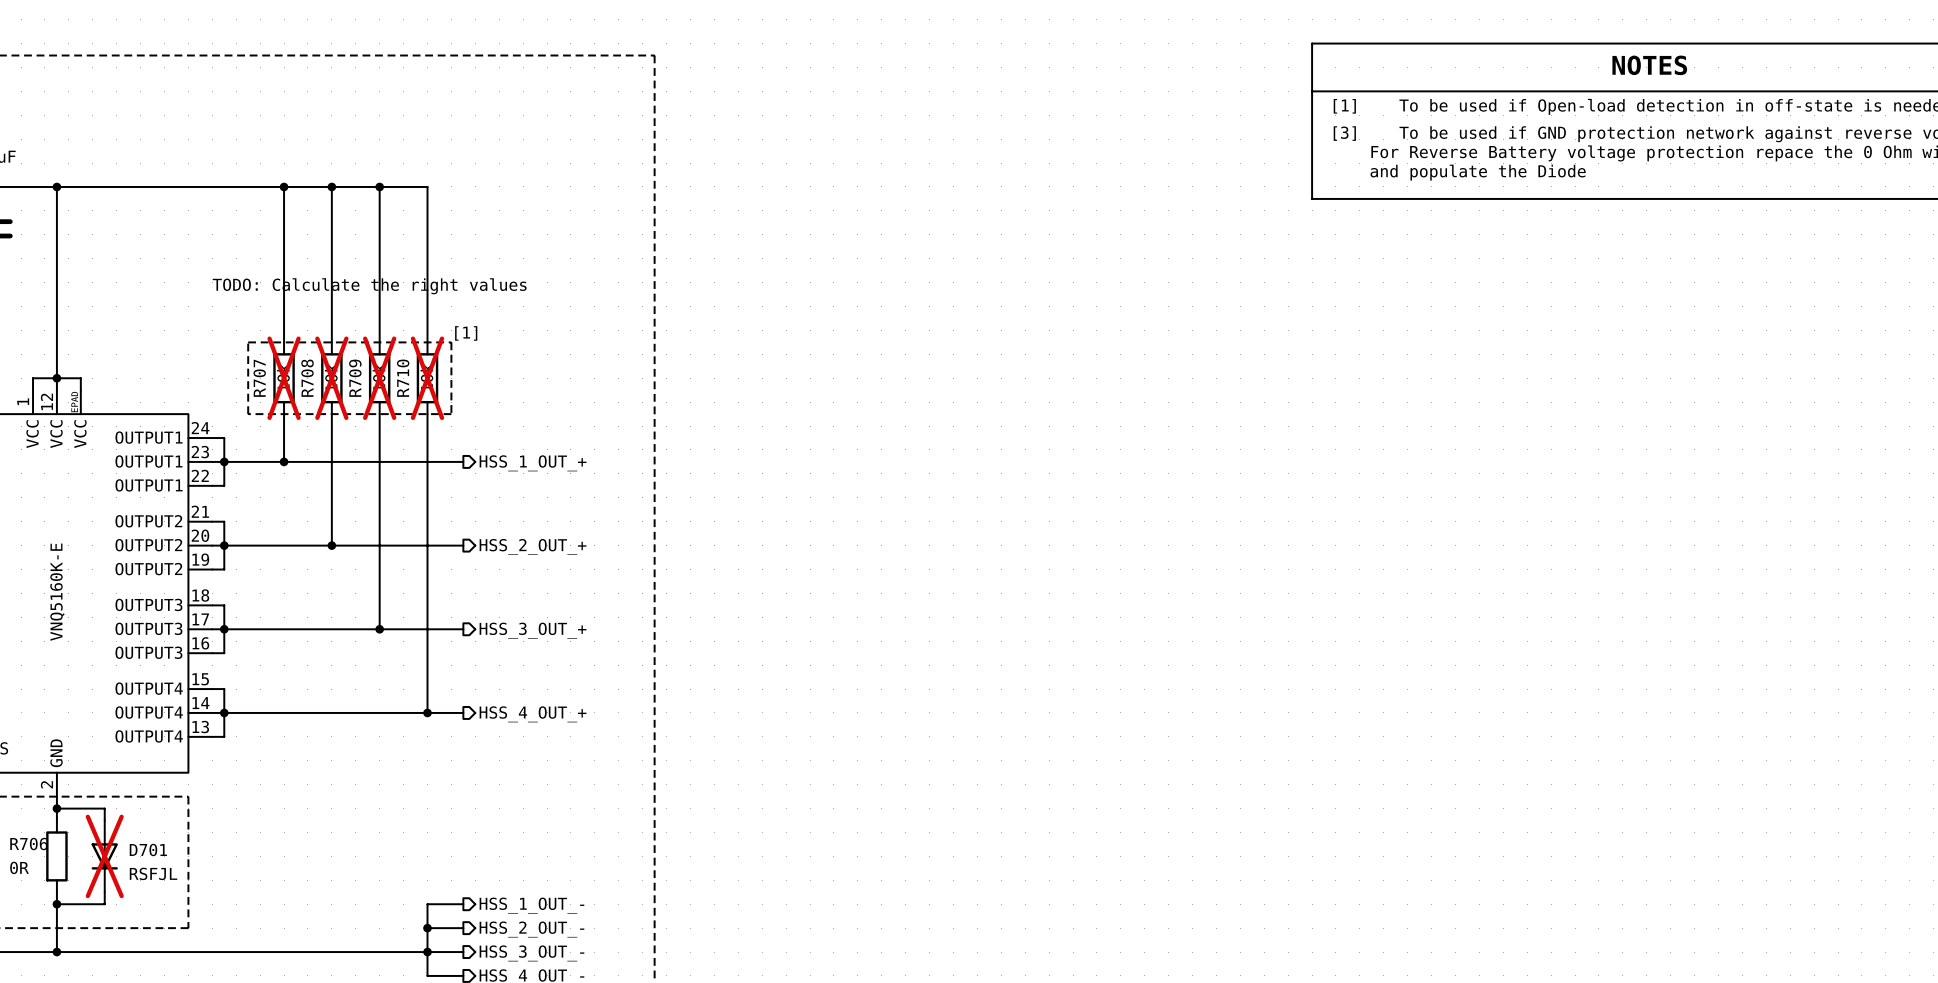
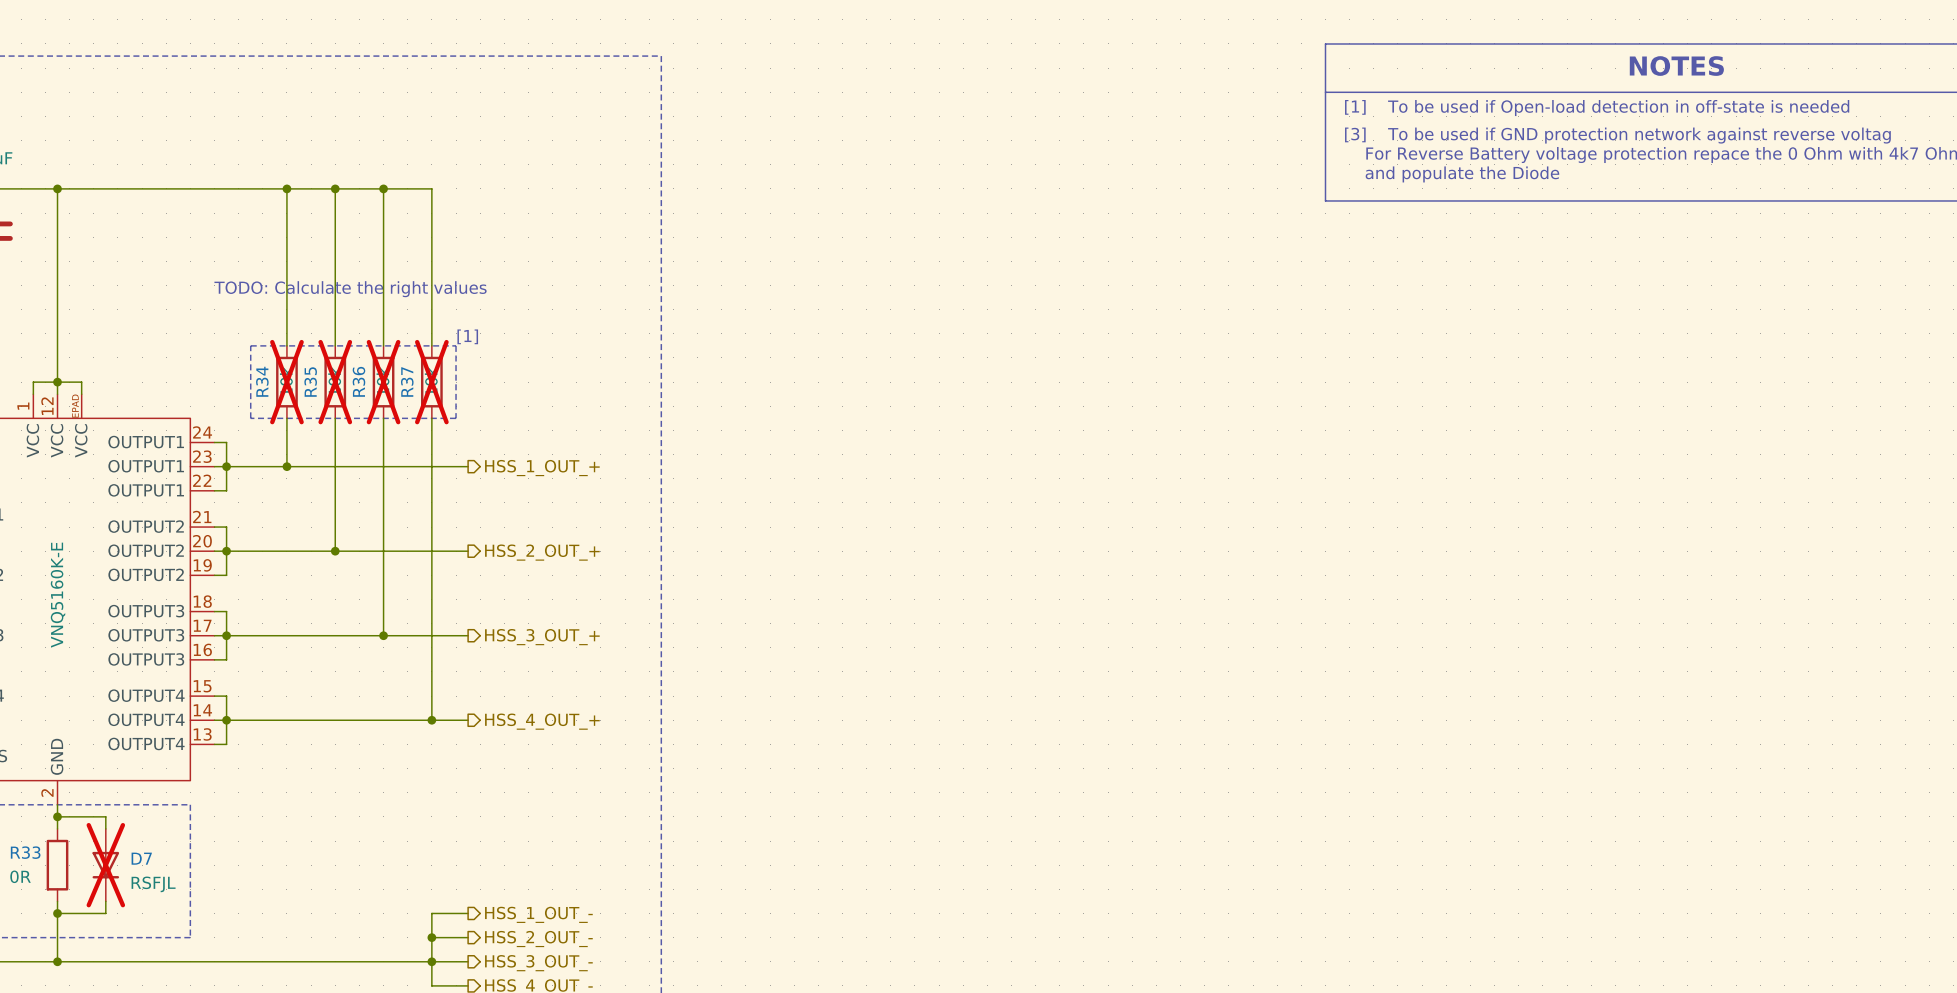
R707 name: R707 (259, 378) -> R34 (262, 381)
R708 name: R708 (307, 378) -> R35 (310, 382)
R709 name: R709 (355, 378) -> R36 (358, 381)
R710 name: R710 (403, 378) -> R37 (407, 382)
R706 name: R706 (28, 844) -> R33 (25, 852)
D701 name: D701 (148, 850) -> D7 (141, 858)

